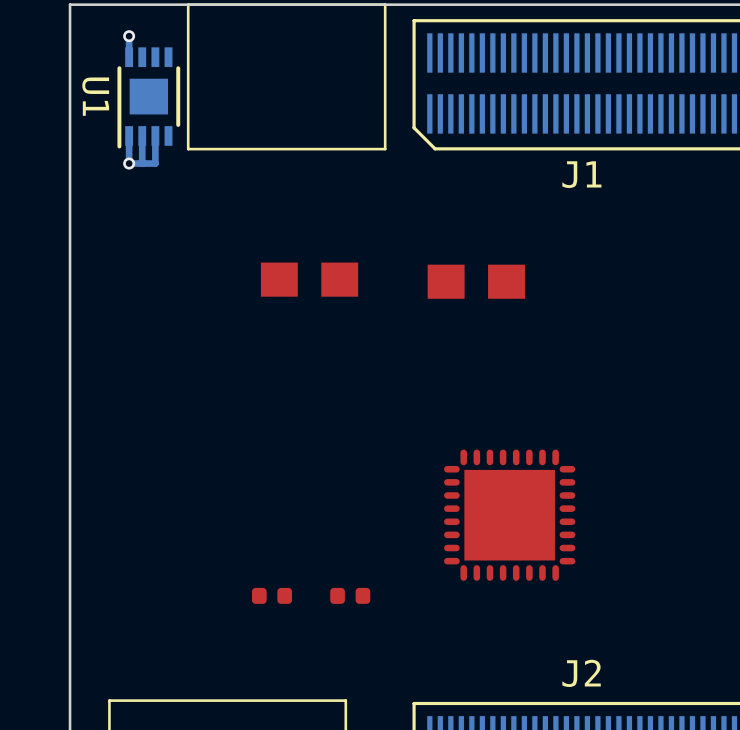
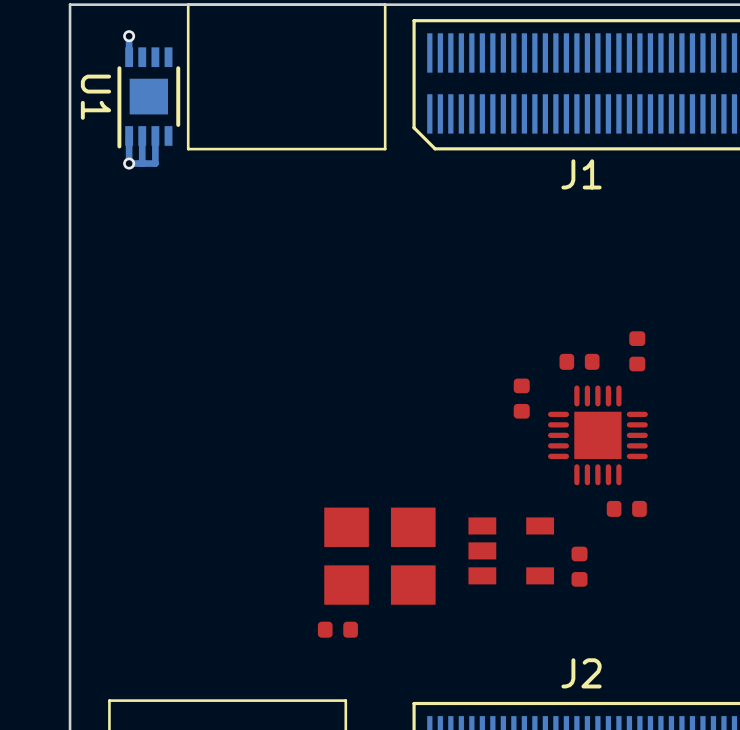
part: (309, 279) -> none
part: (476, 281) -> none
part: none -> (637, 351)
part: none -> (579, 361)
part: none -> (521, 398)
part: none -> (597, 435)
part: none -> (626, 508)
part: (509, 515) -> none
part: none -> (511, 550)
part: none -> (379, 556)
part: none -> (579, 566)
part: (271, 595) -> none
part position: (350, 595) -> (337, 629)

